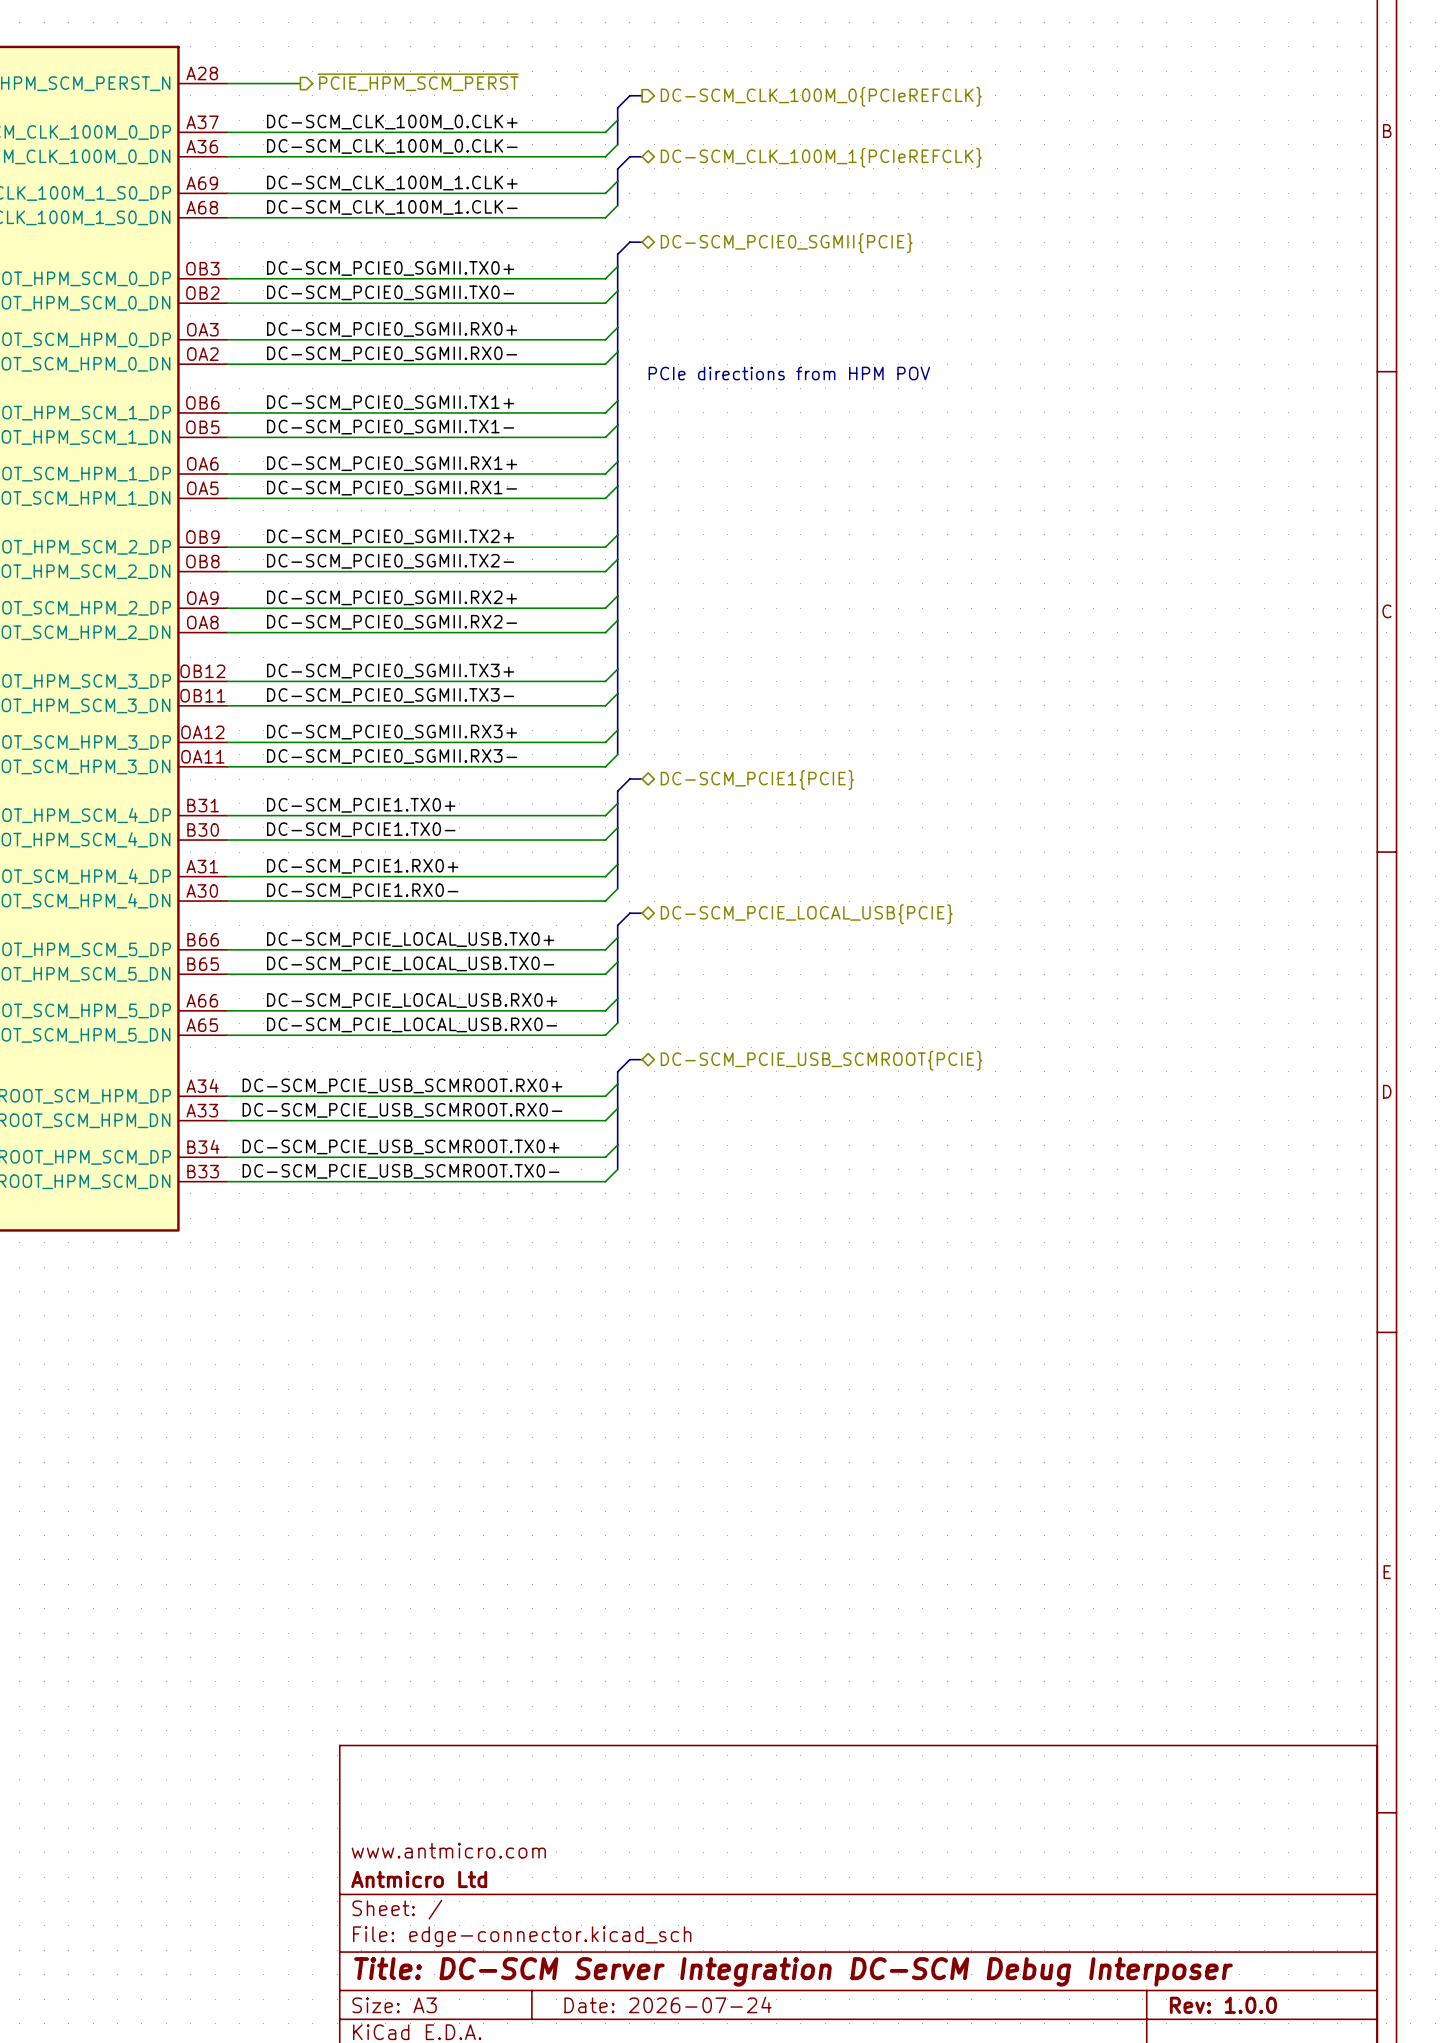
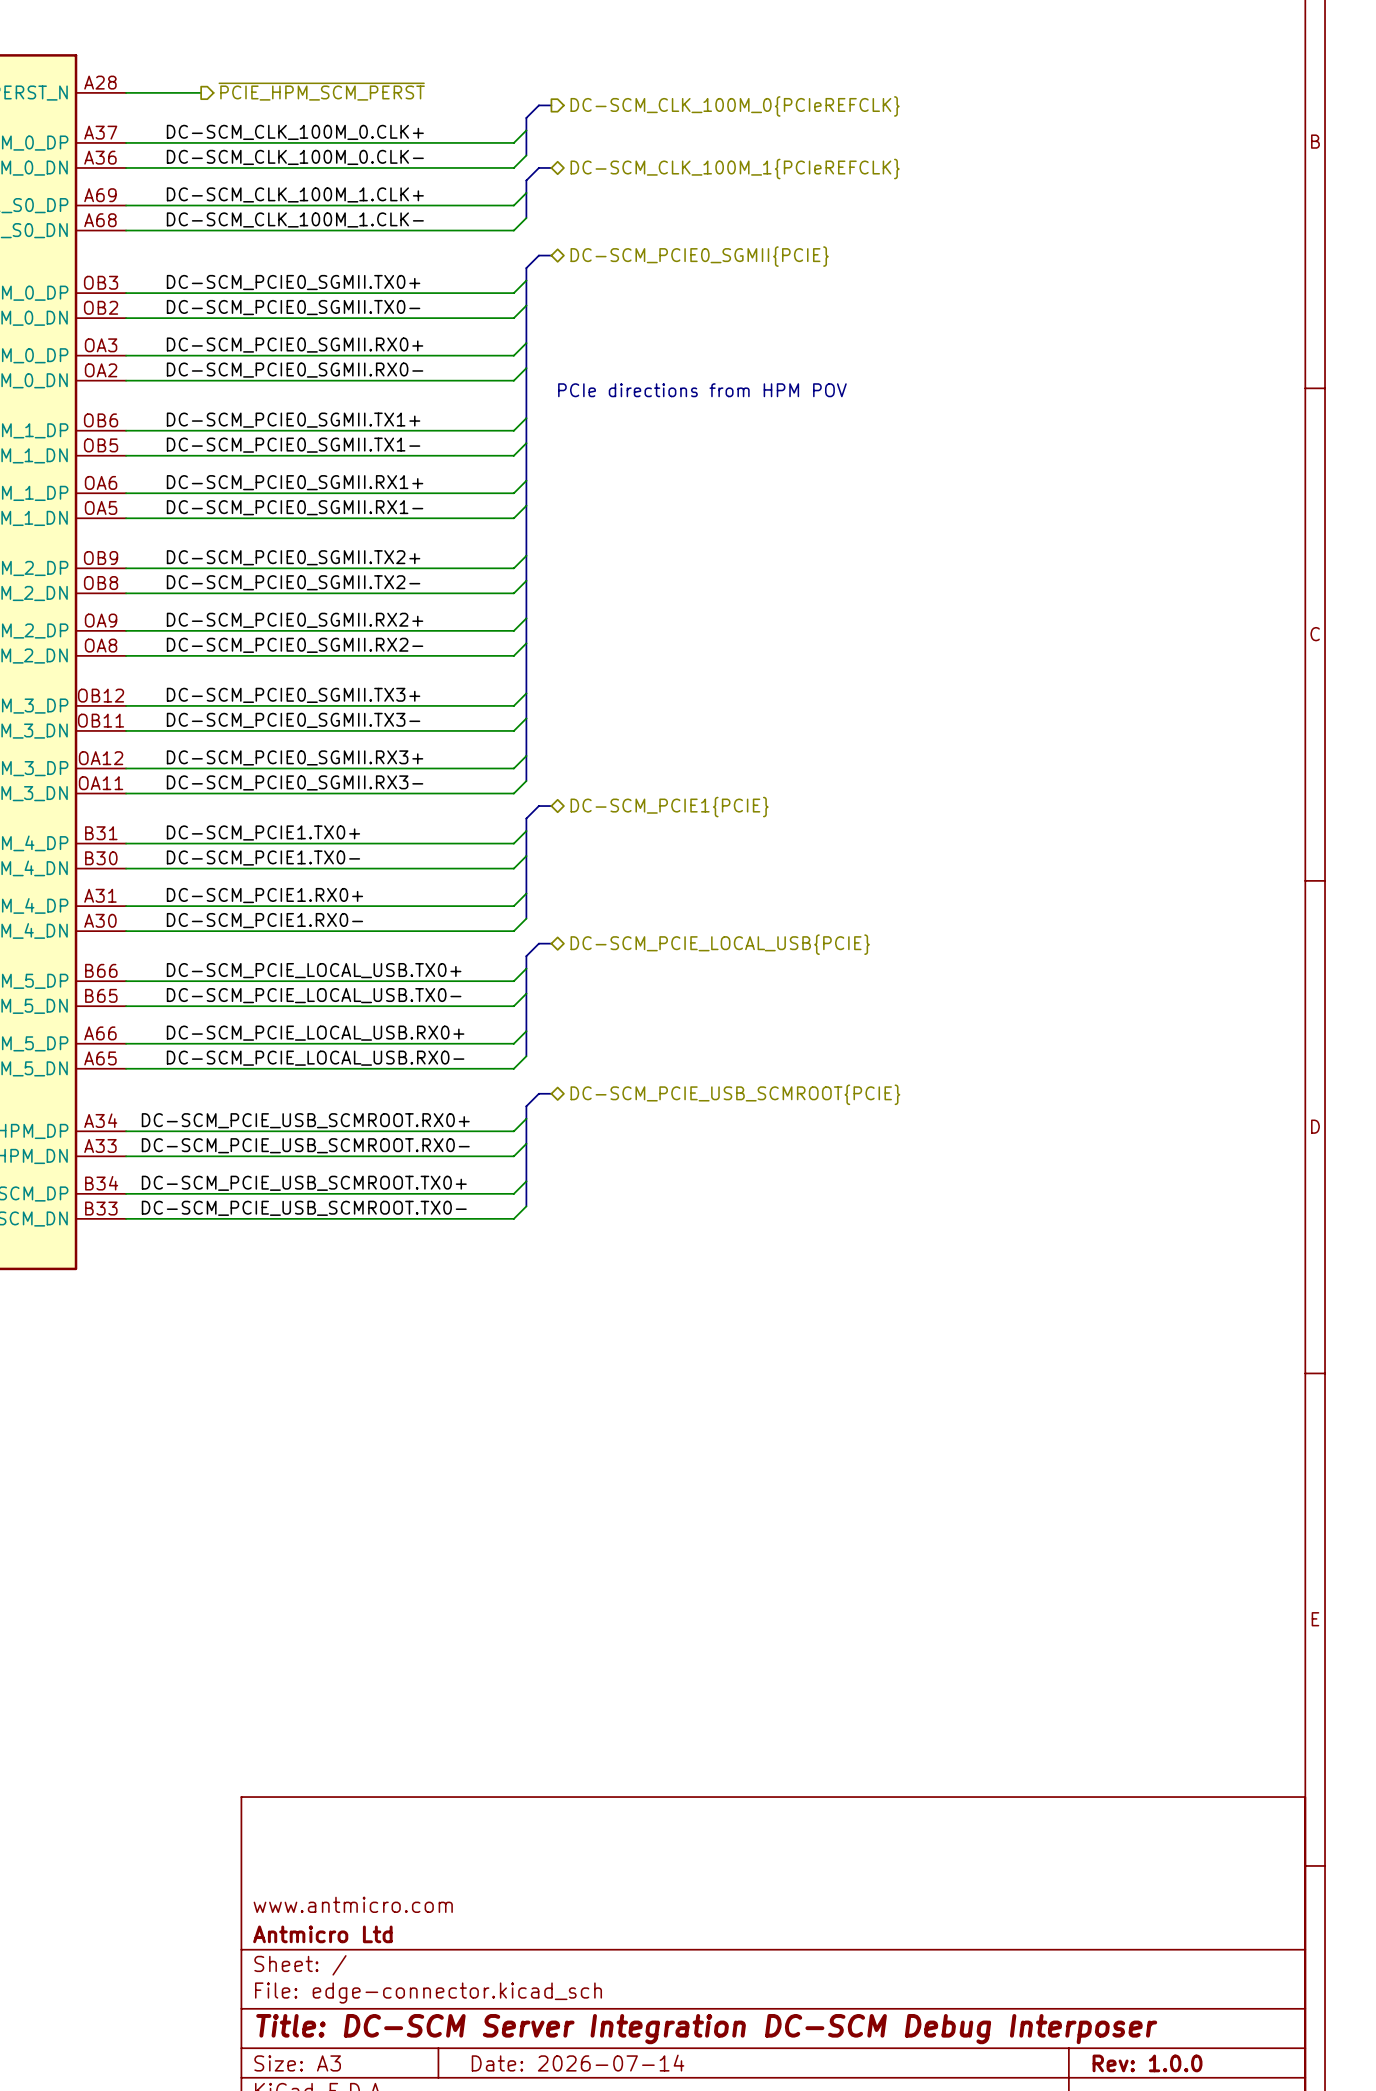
title block: Date: 2026-07-24 (668, 2004) -> Date: 2026-07-14 (578, 2063)

